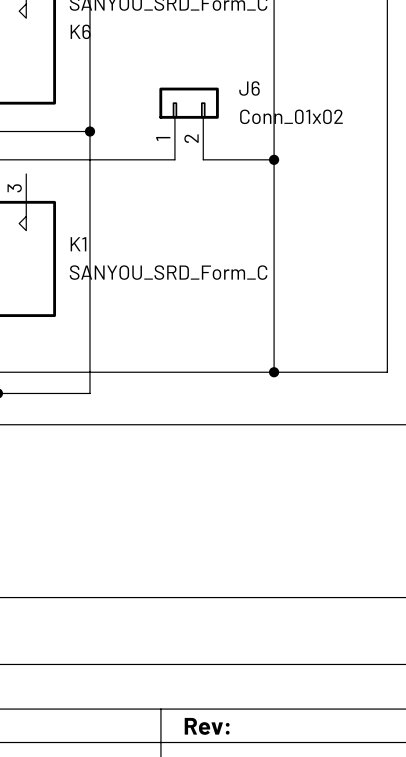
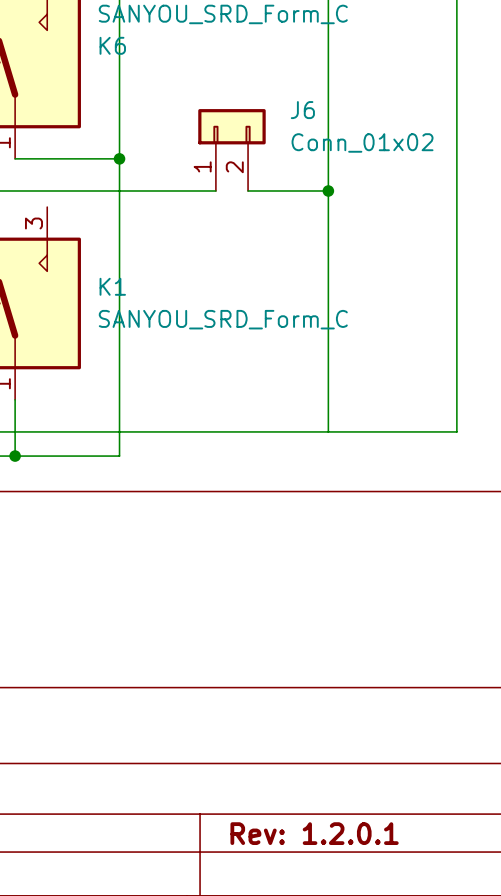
junction: (274, 372) -> none
title block: Rev: (207, 726) -> Rev: 1.2.0.1 (314, 833)

